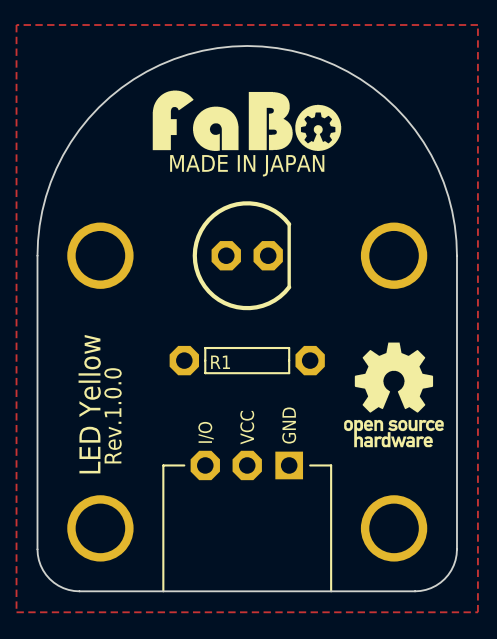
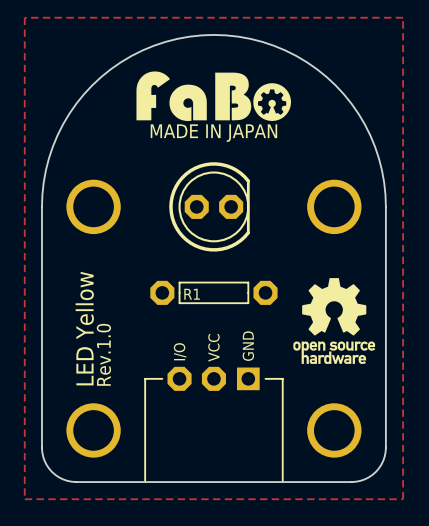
part footprint: [192, 201, 292, 311] -> [169, 162, 251, 252]
text: Rev.1.0.0 (113, 415) -> Rev.1.0 (103, 354)

